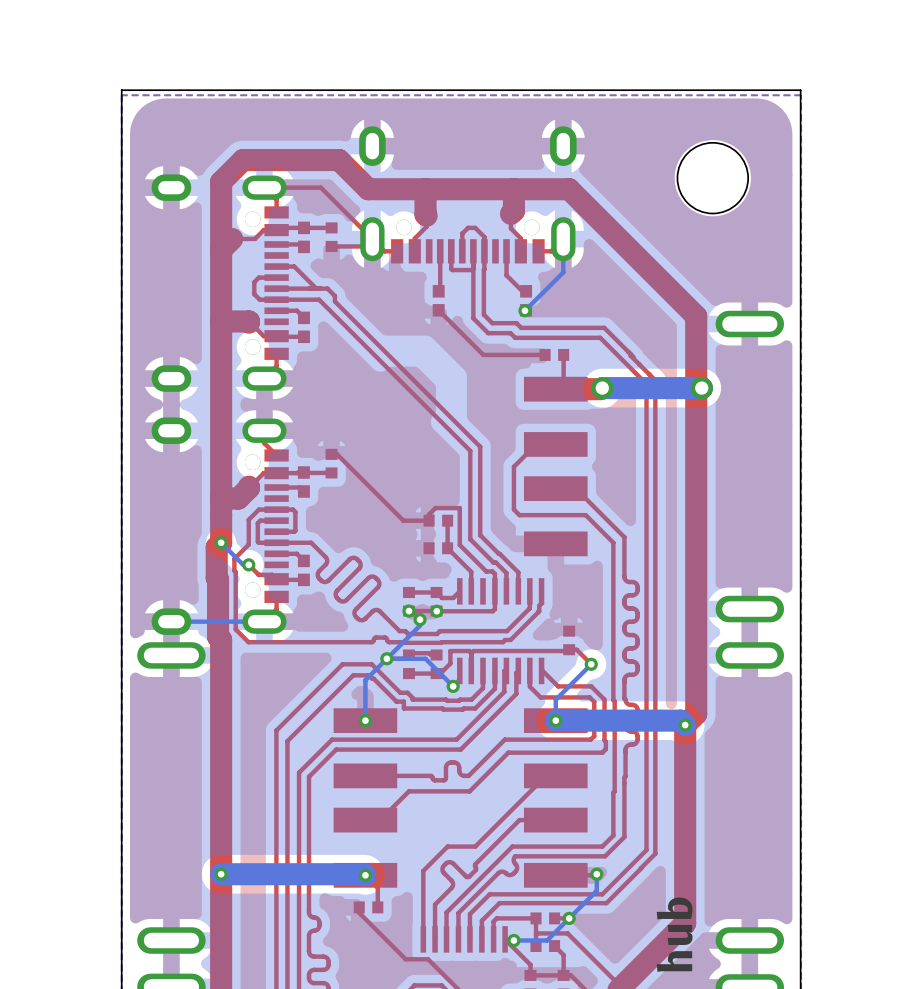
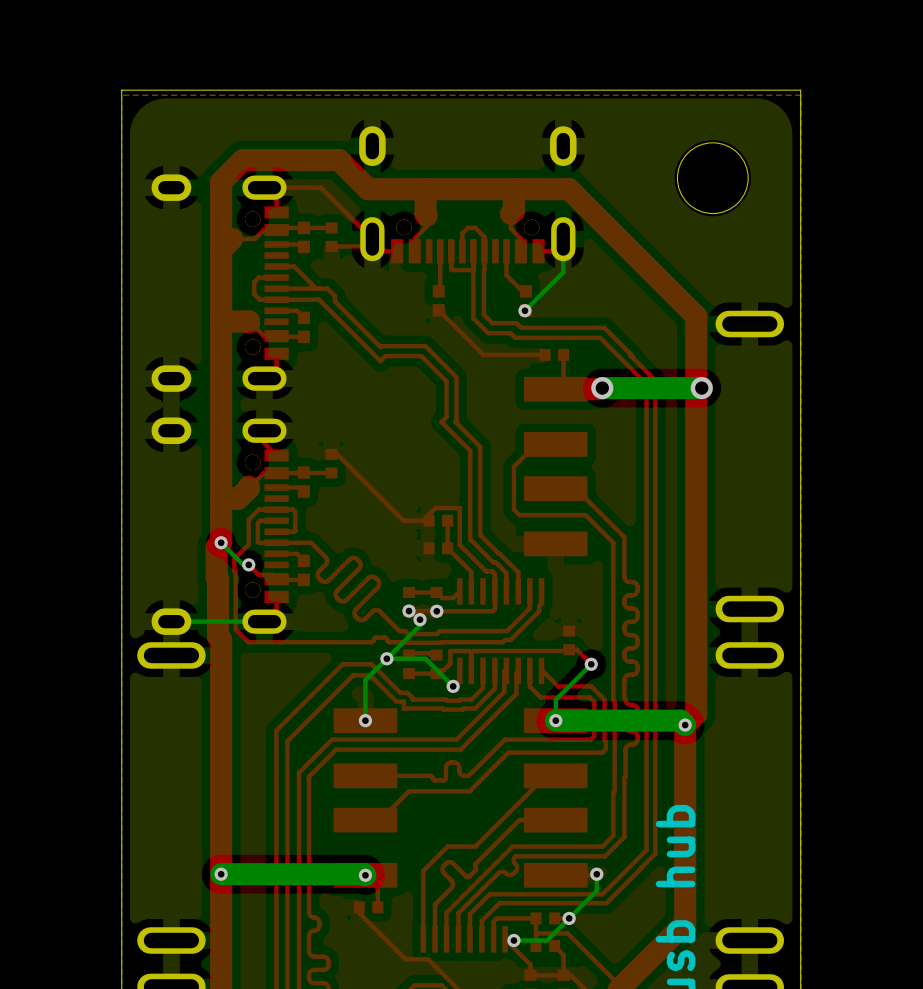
top track: (380, 347) (455, 422) -> (380, 347) (425, 346) (456, 377) (455, 422)
top track: (380, 361) (441, 422) -> (380, 361) (385, 356) (421, 356) (446, 381) (446, 416) (441, 422)

